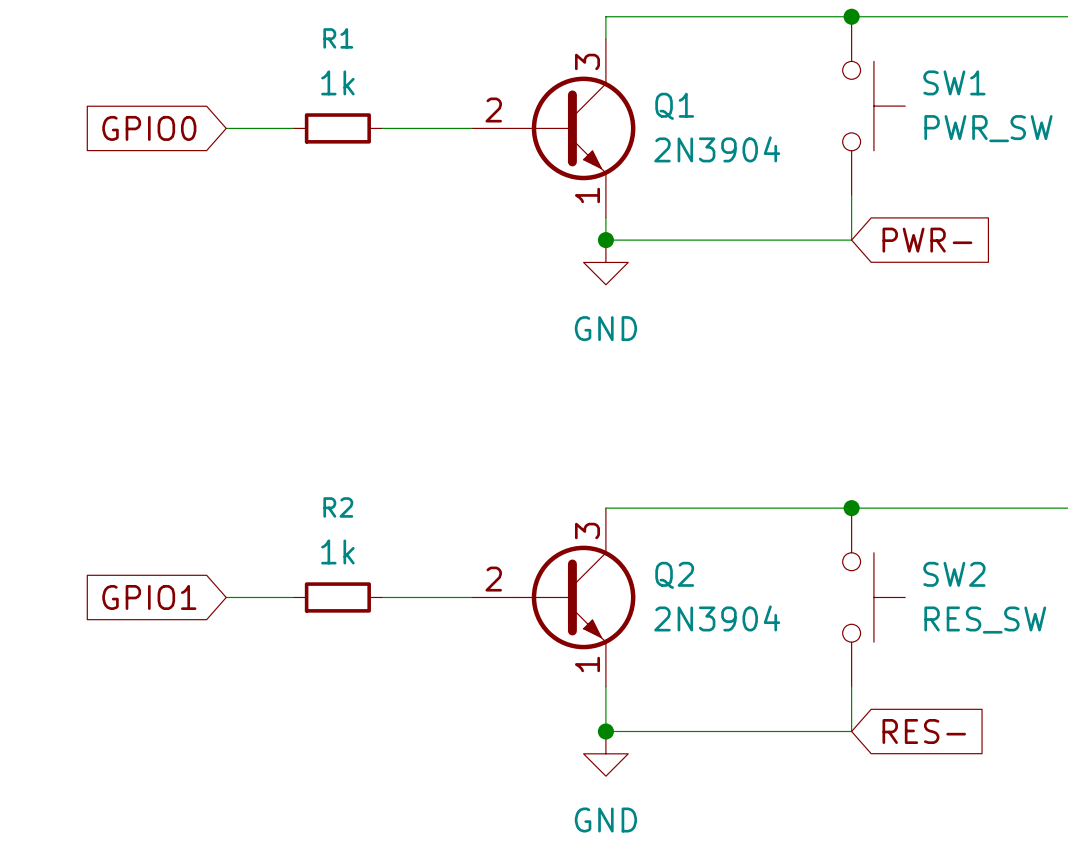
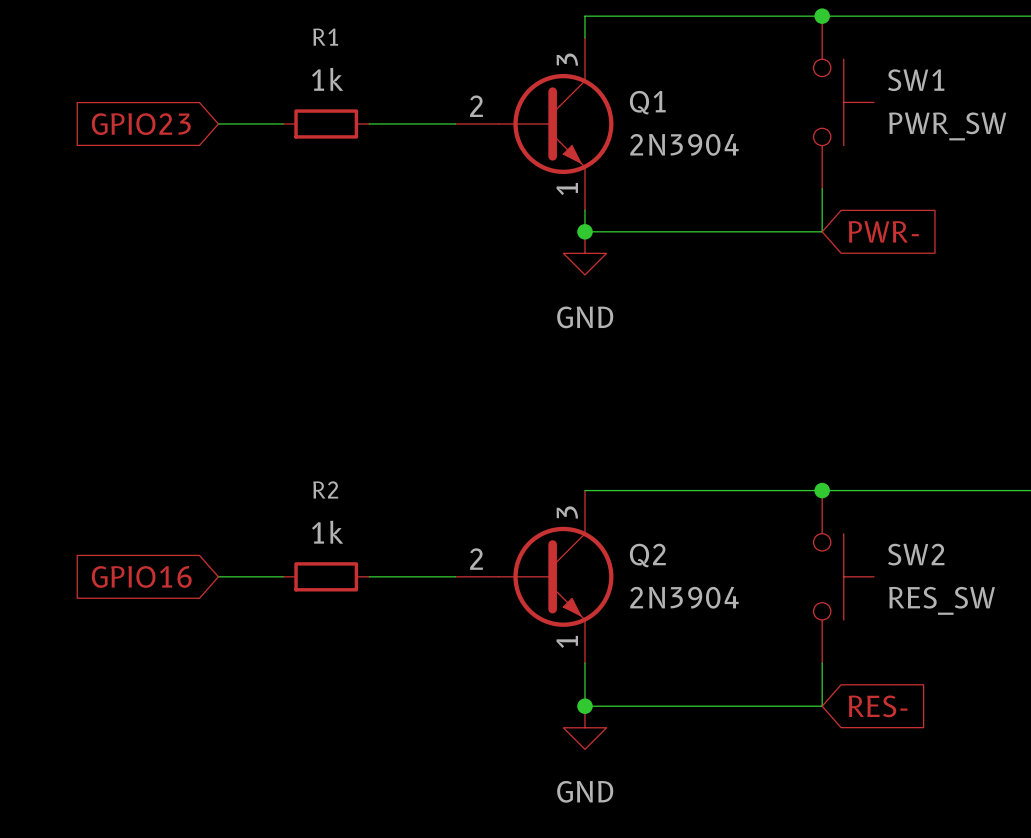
global label: GPIO0 (149, 128) -> GPIO23 (141, 124)
global label: GPIO1 (149, 597) -> GPIO16 (141, 576)

